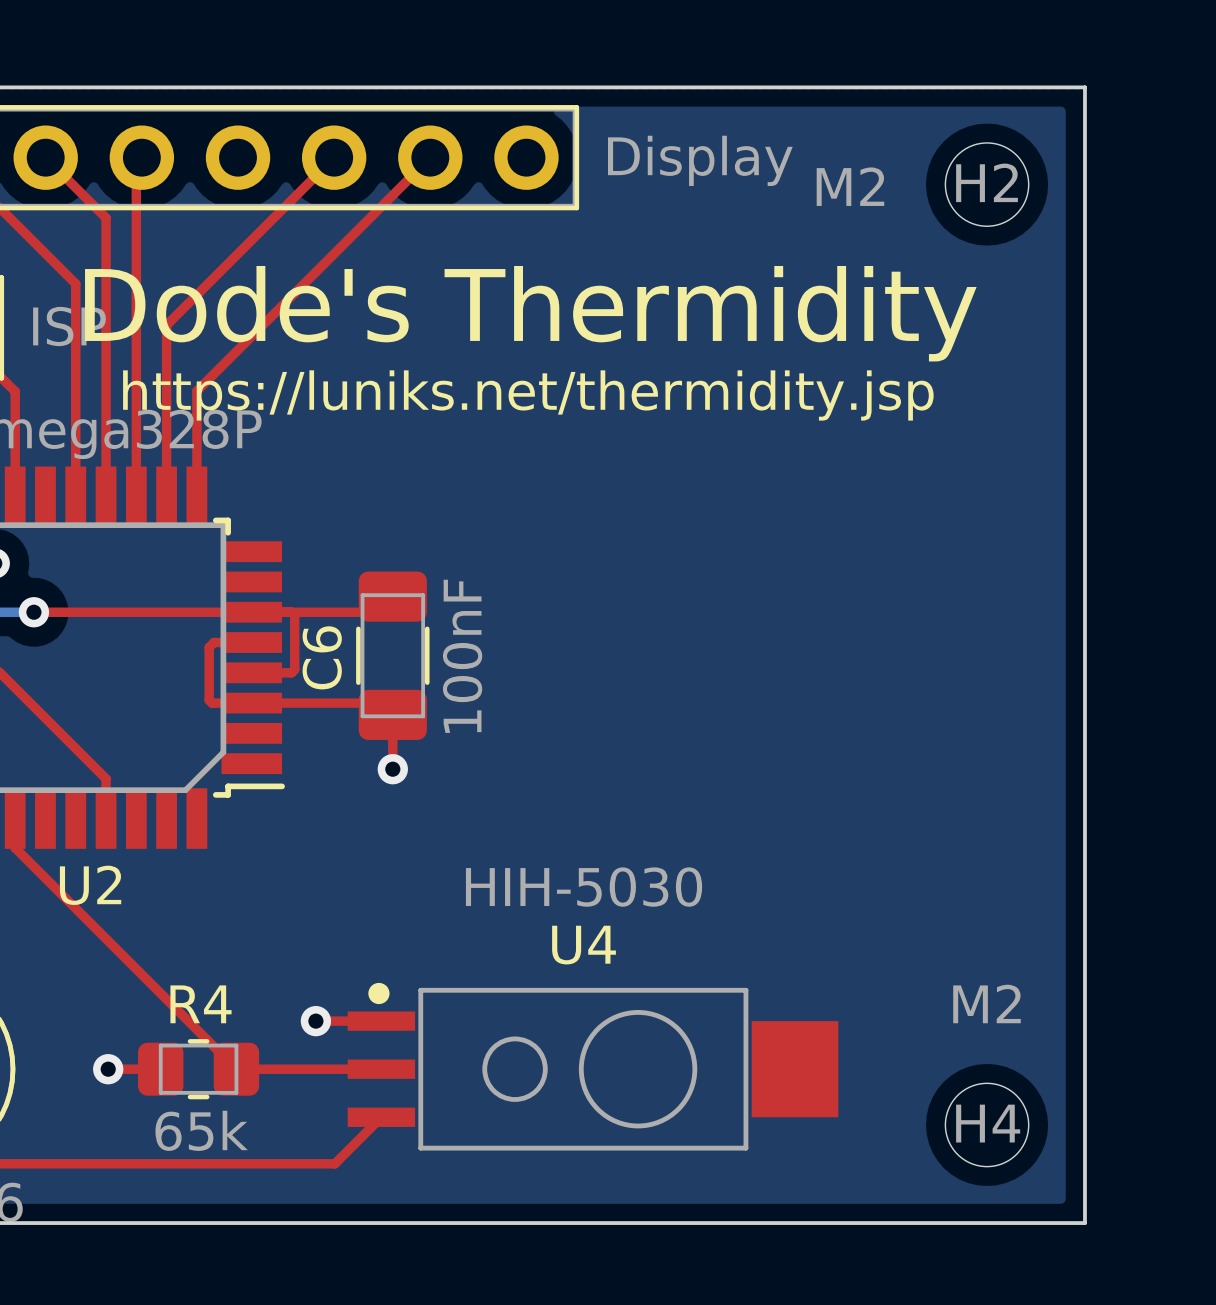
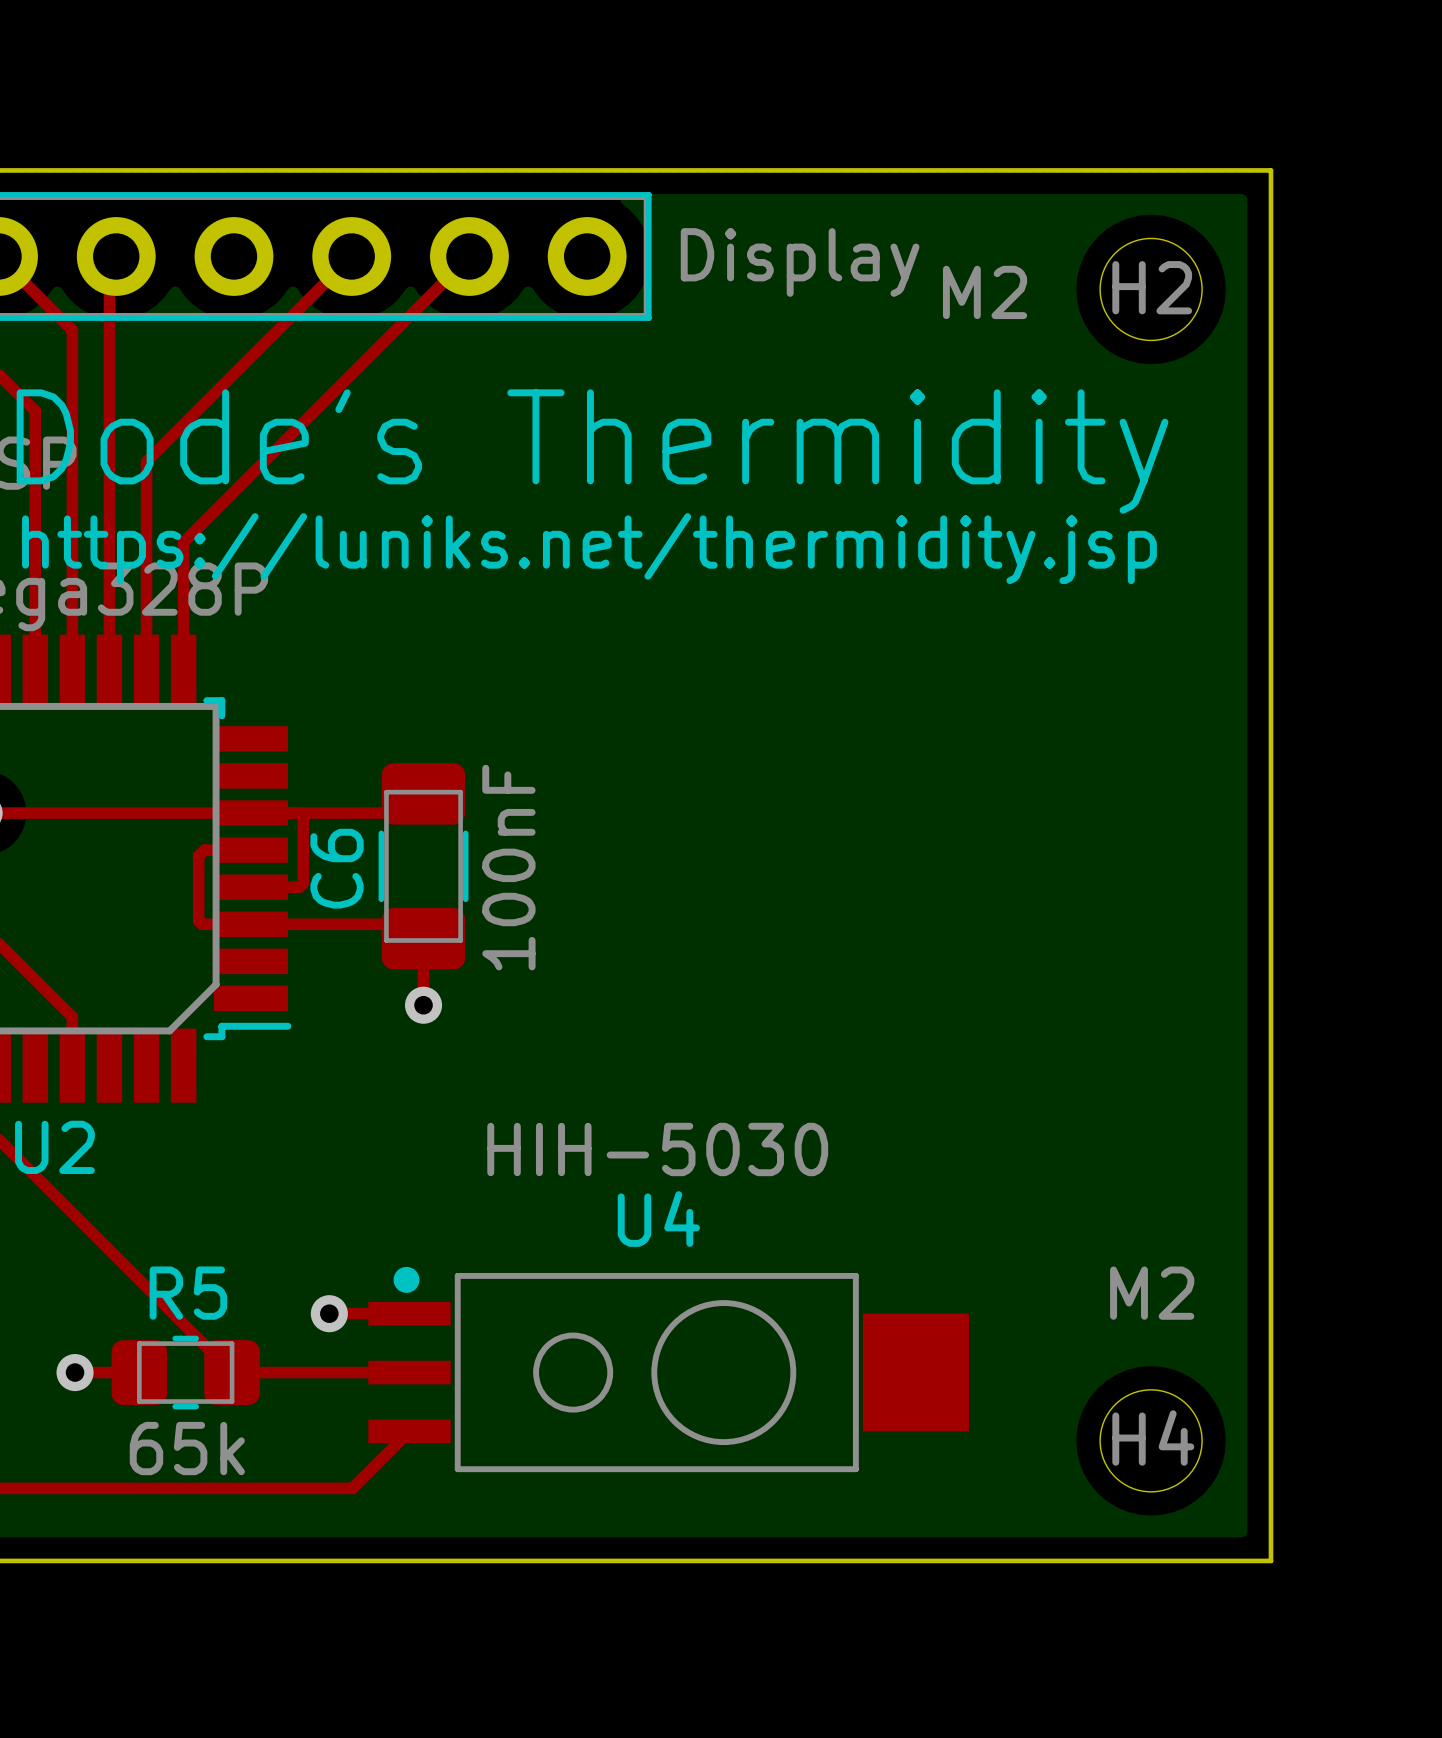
R4 name: R4 (201, 1004) -> R5 (188, 1293)

